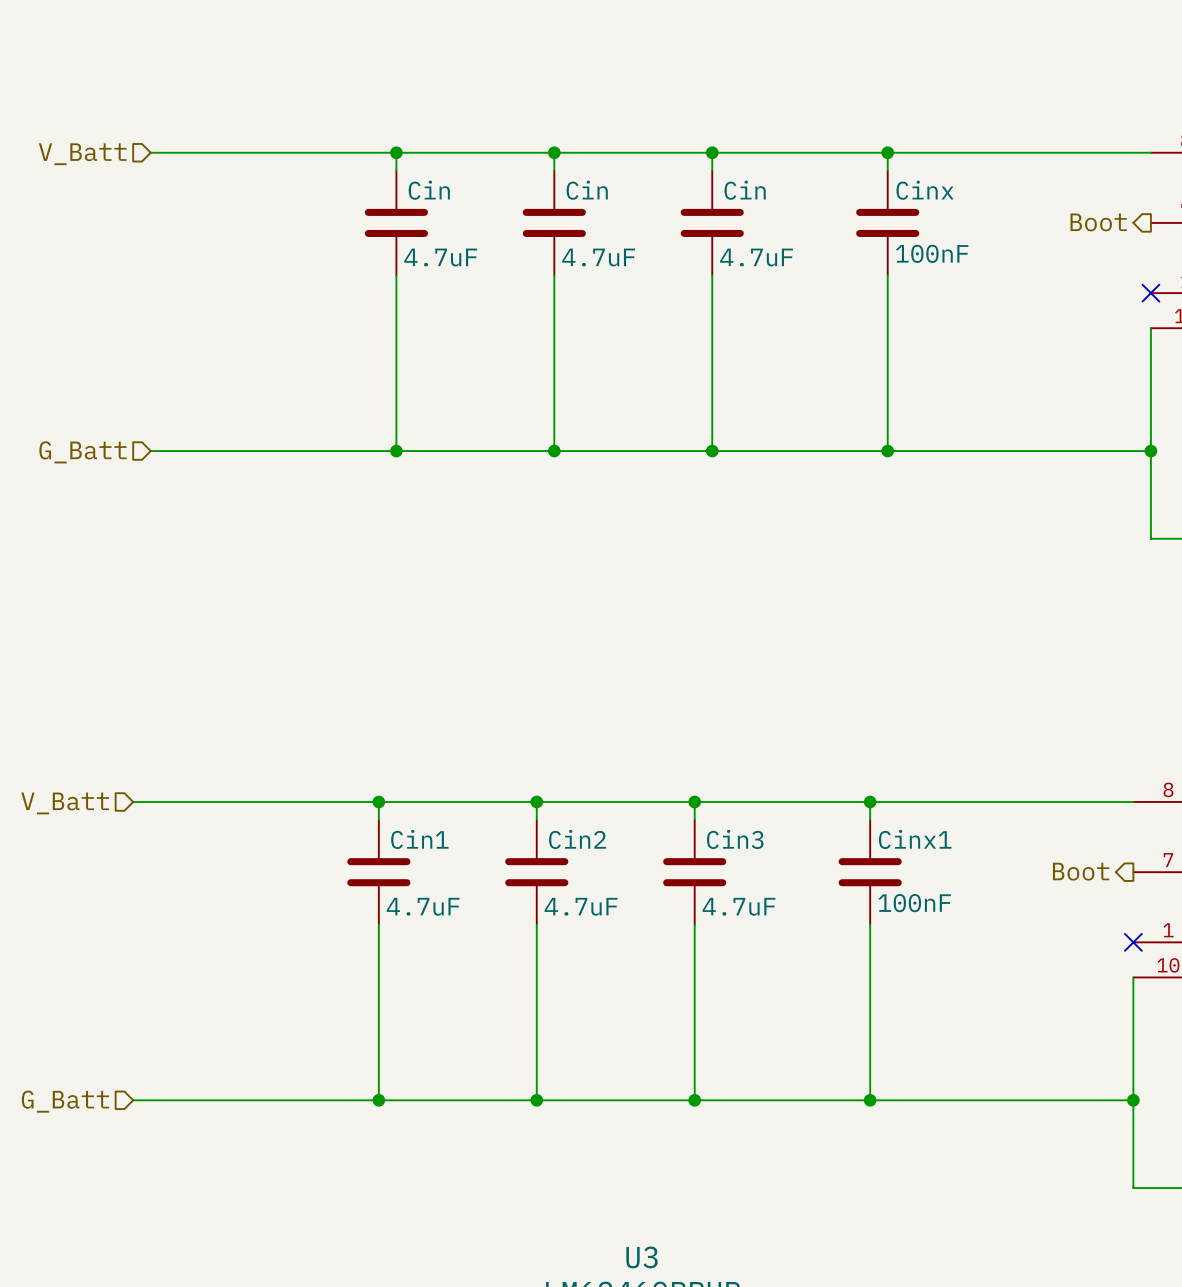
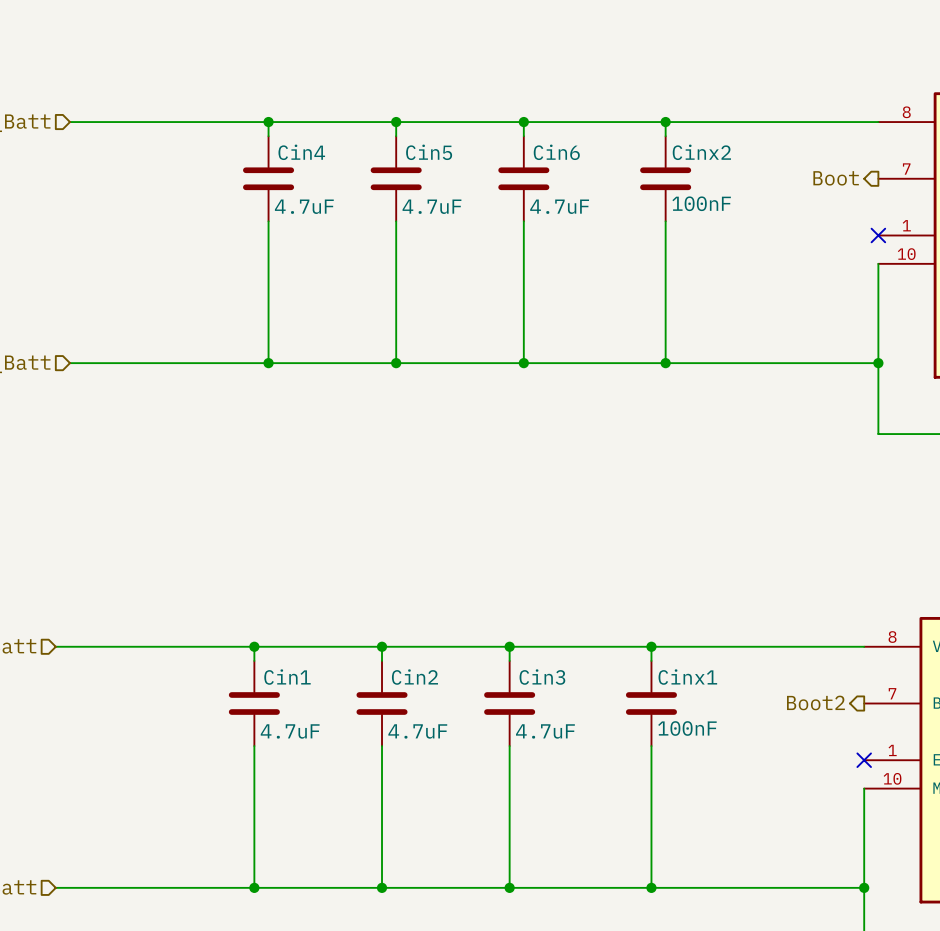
Cin name: Cin (429, 190) -> Cin4 (301, 152)
Cin name: Cin (587, 190) -> Cin5 (429, 152)
Cin name: Cin (745, 190) -> Cin6 (556, 152)
Cinx name: Cinx (925, 190) -> Cinx2 (701, 152)
hierarchical label: Boot (1081, 871) -> Boot2 (815, 702)

